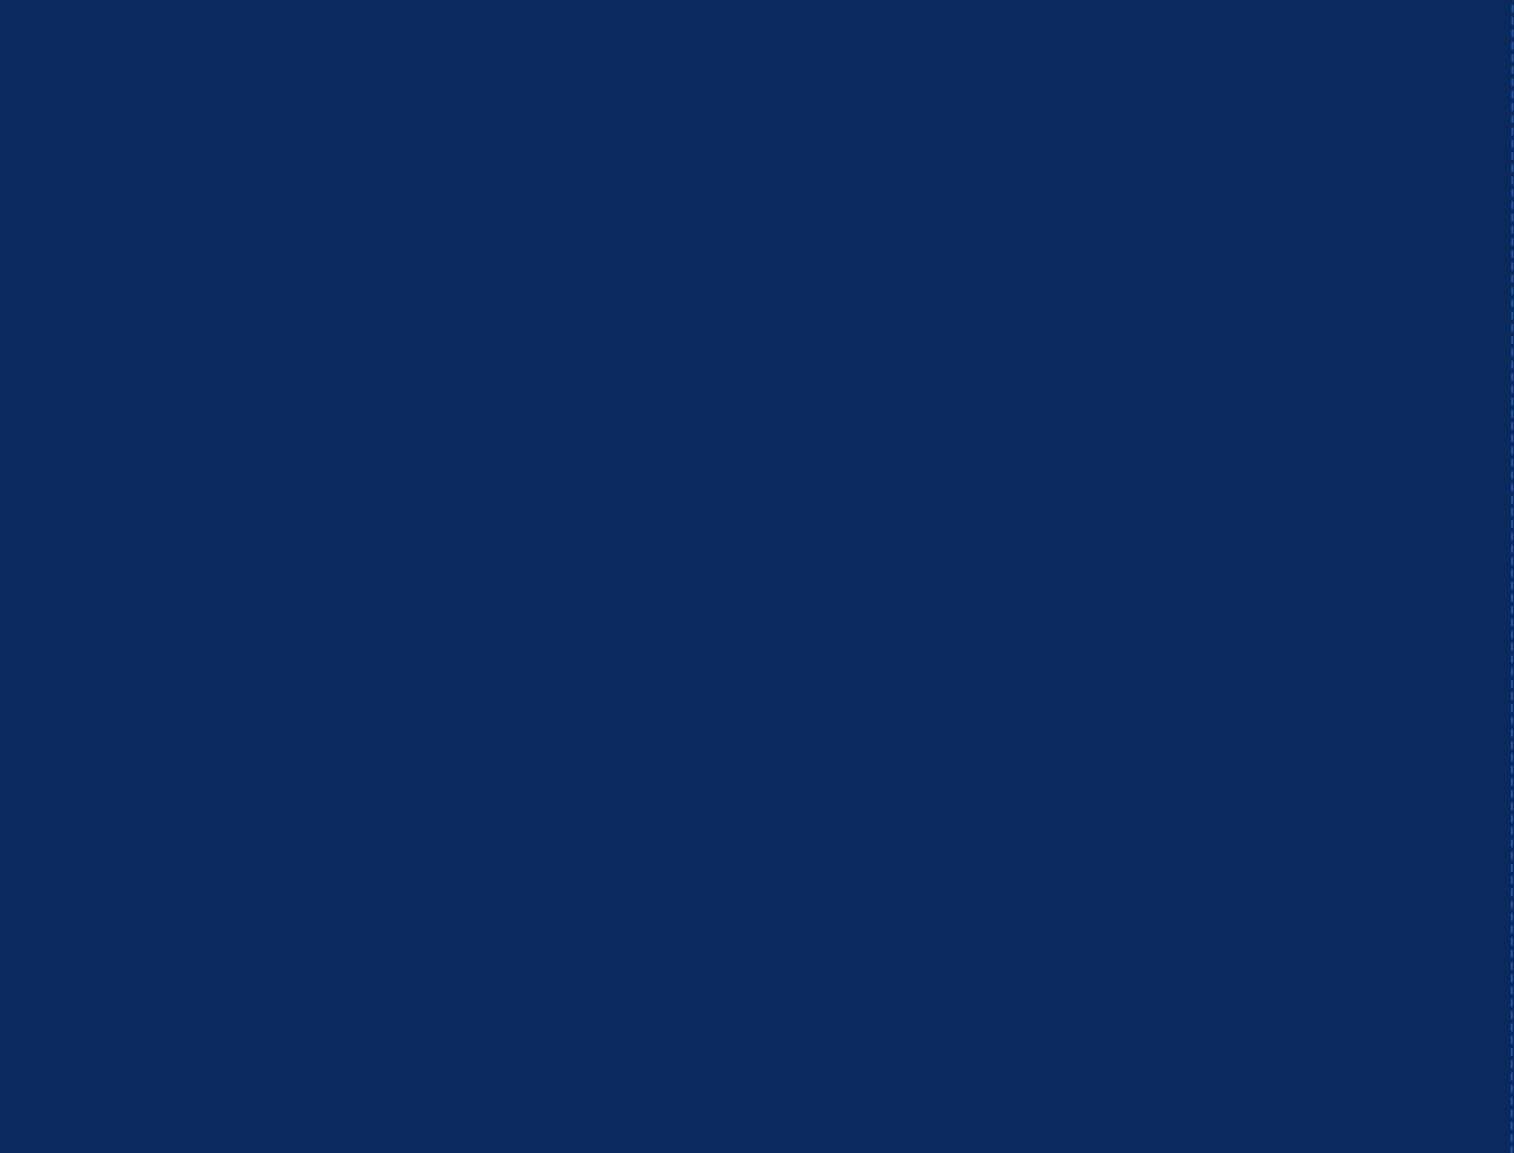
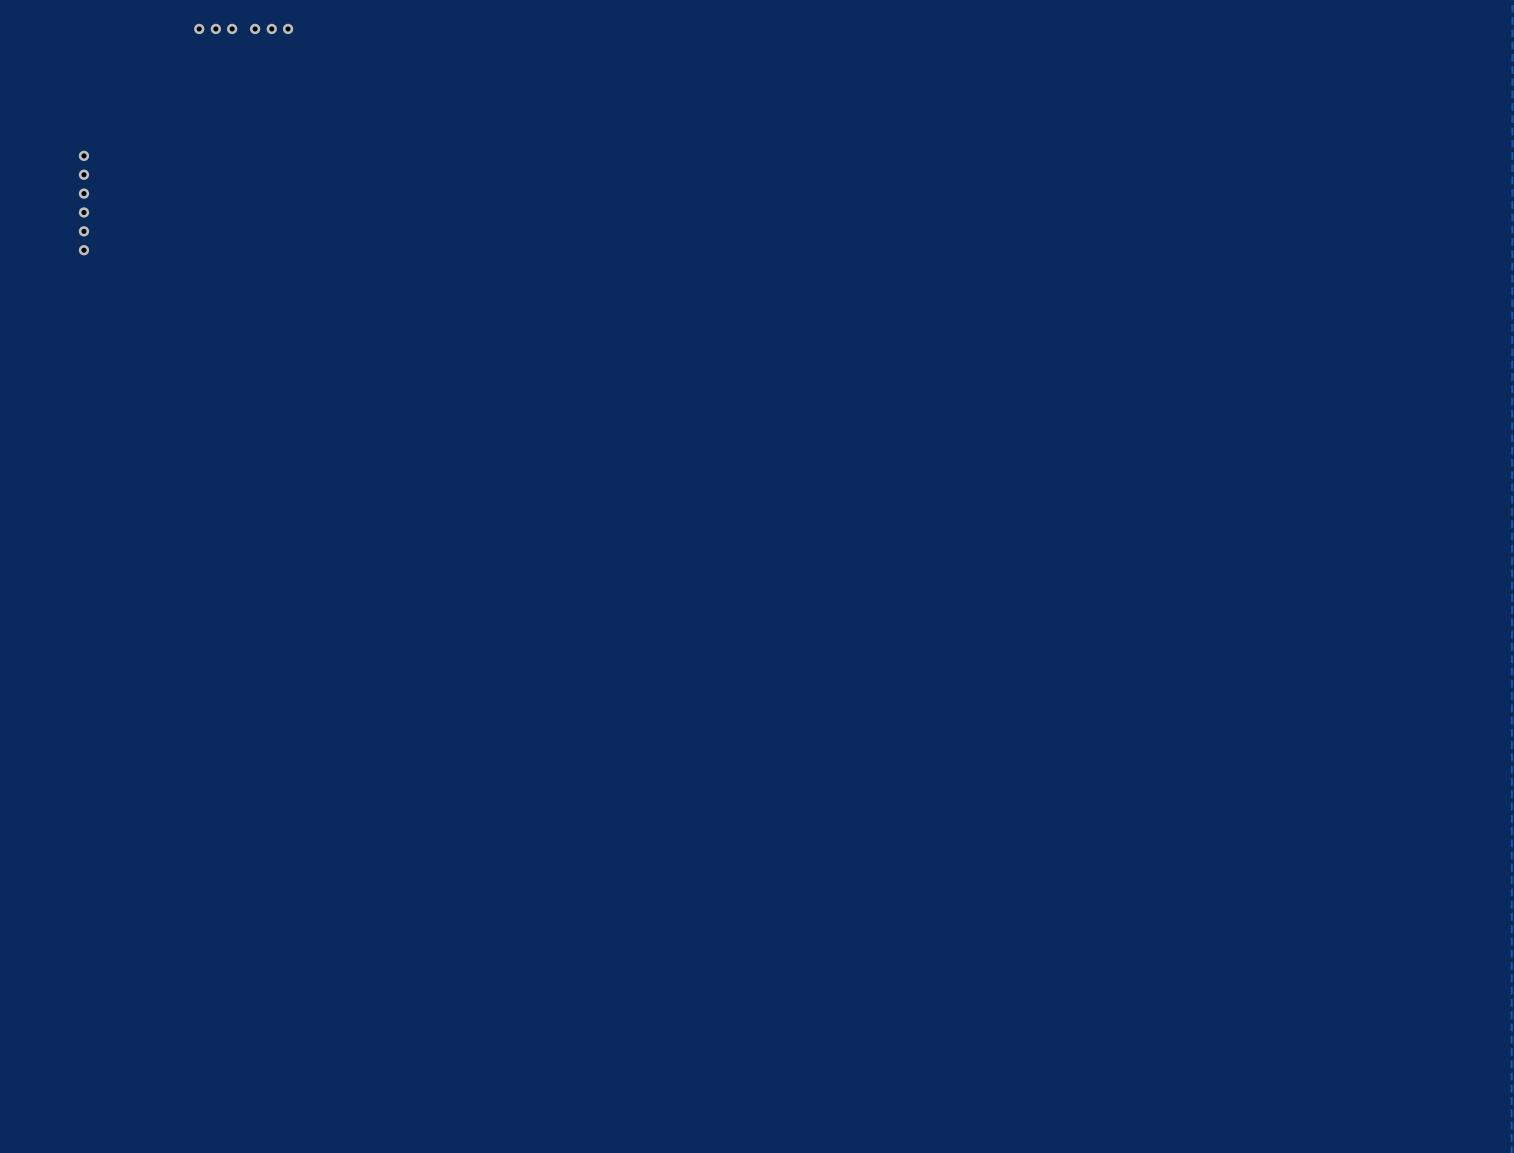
via: none -> (199, 28)
via: none -> (215, 28)
via: none -> (232, 28)
via: none -> (255, 28)
via: none -> (271, 28)
via: none -> (288, 28)
via: none -> (83, 155)
via: none -> (83, 174)
via: none -> (83, 193)
via: none -> (83, 212)
via: none -> (83, 231)
via: none -> (83, 250)

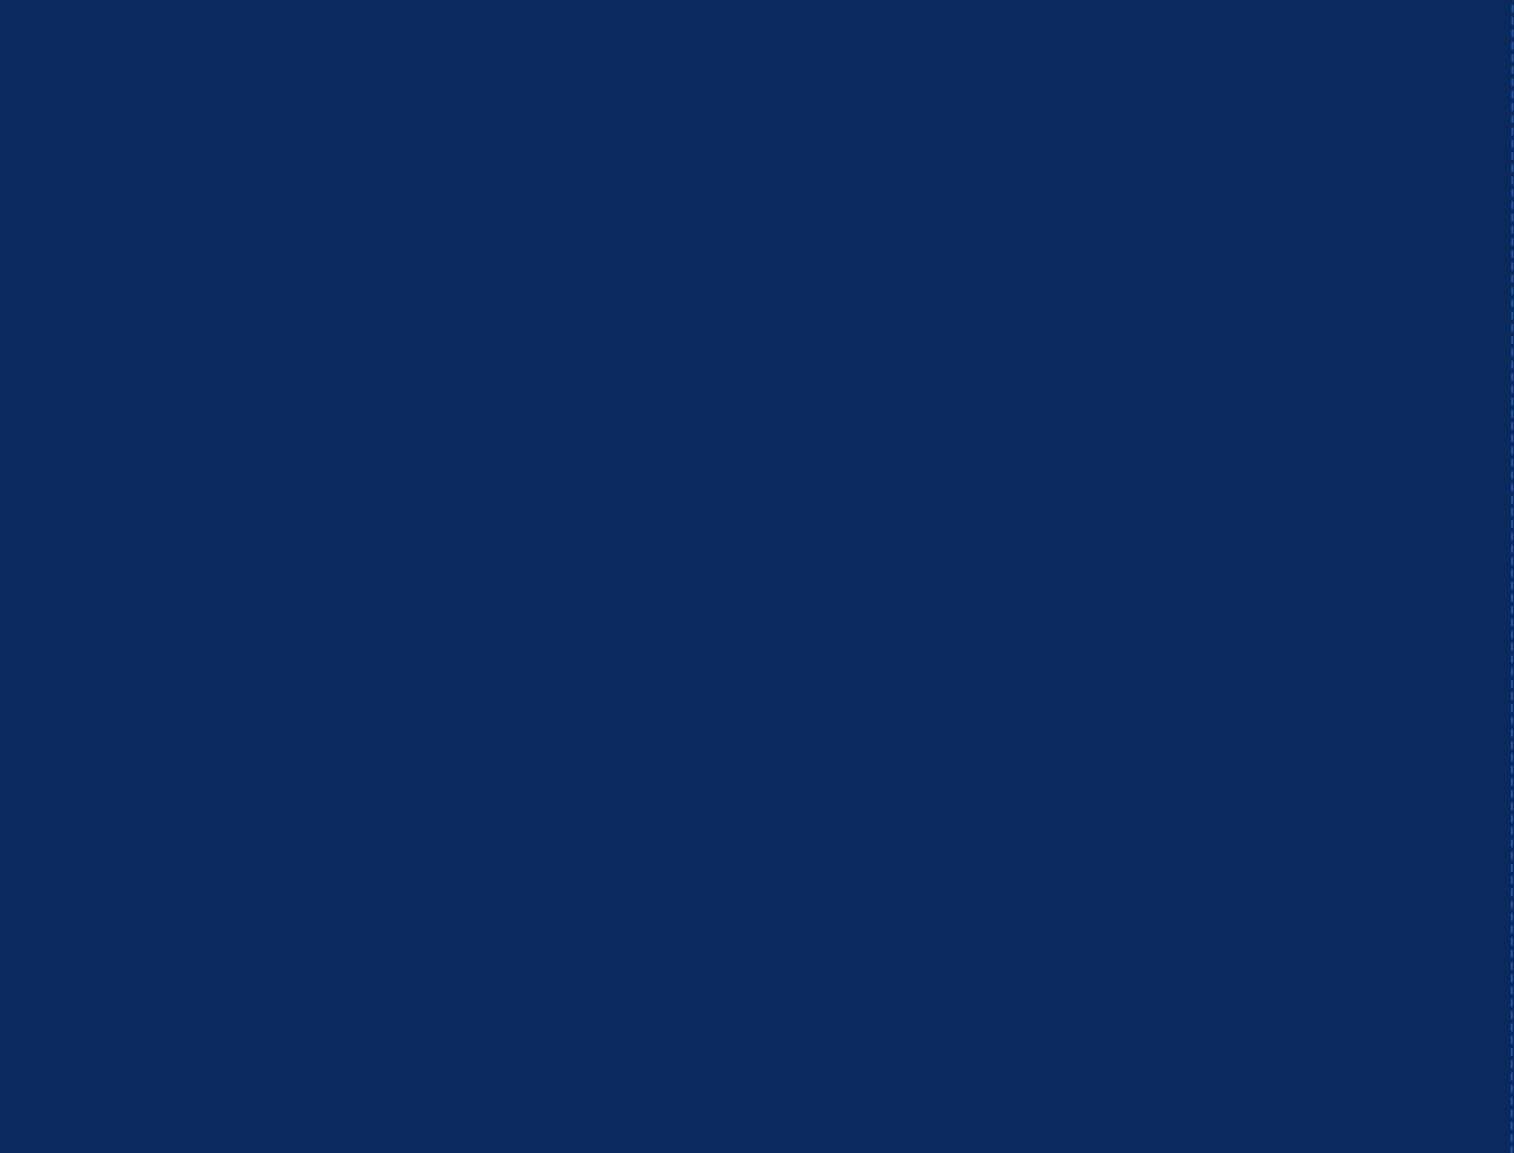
via: (199, 28) -> none
via: (215, 28) -> none
via: (232, 28) -> none
via: (255, 28) -> none
via: (271, 28) -> none
via: (288, 28) -> none
via: (83, 155) -> none
via: (83, 174) -> none
via: (83, 193) -> none
via: (83, 212) -> none
via: (83, 231) -> none
via: (83, 250) -> none

